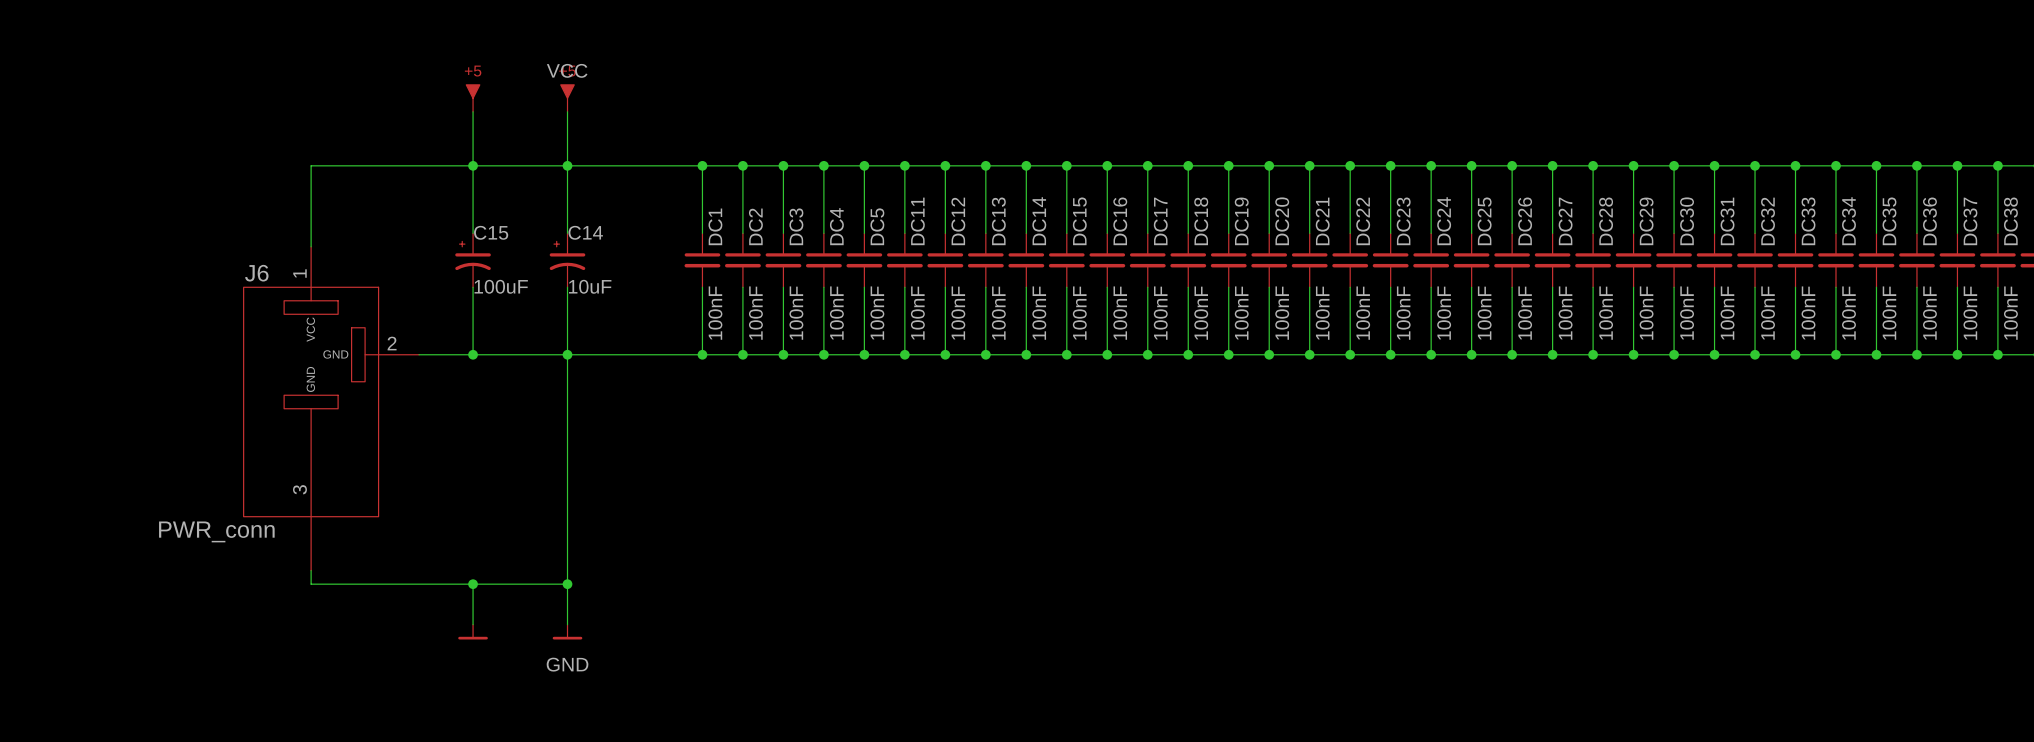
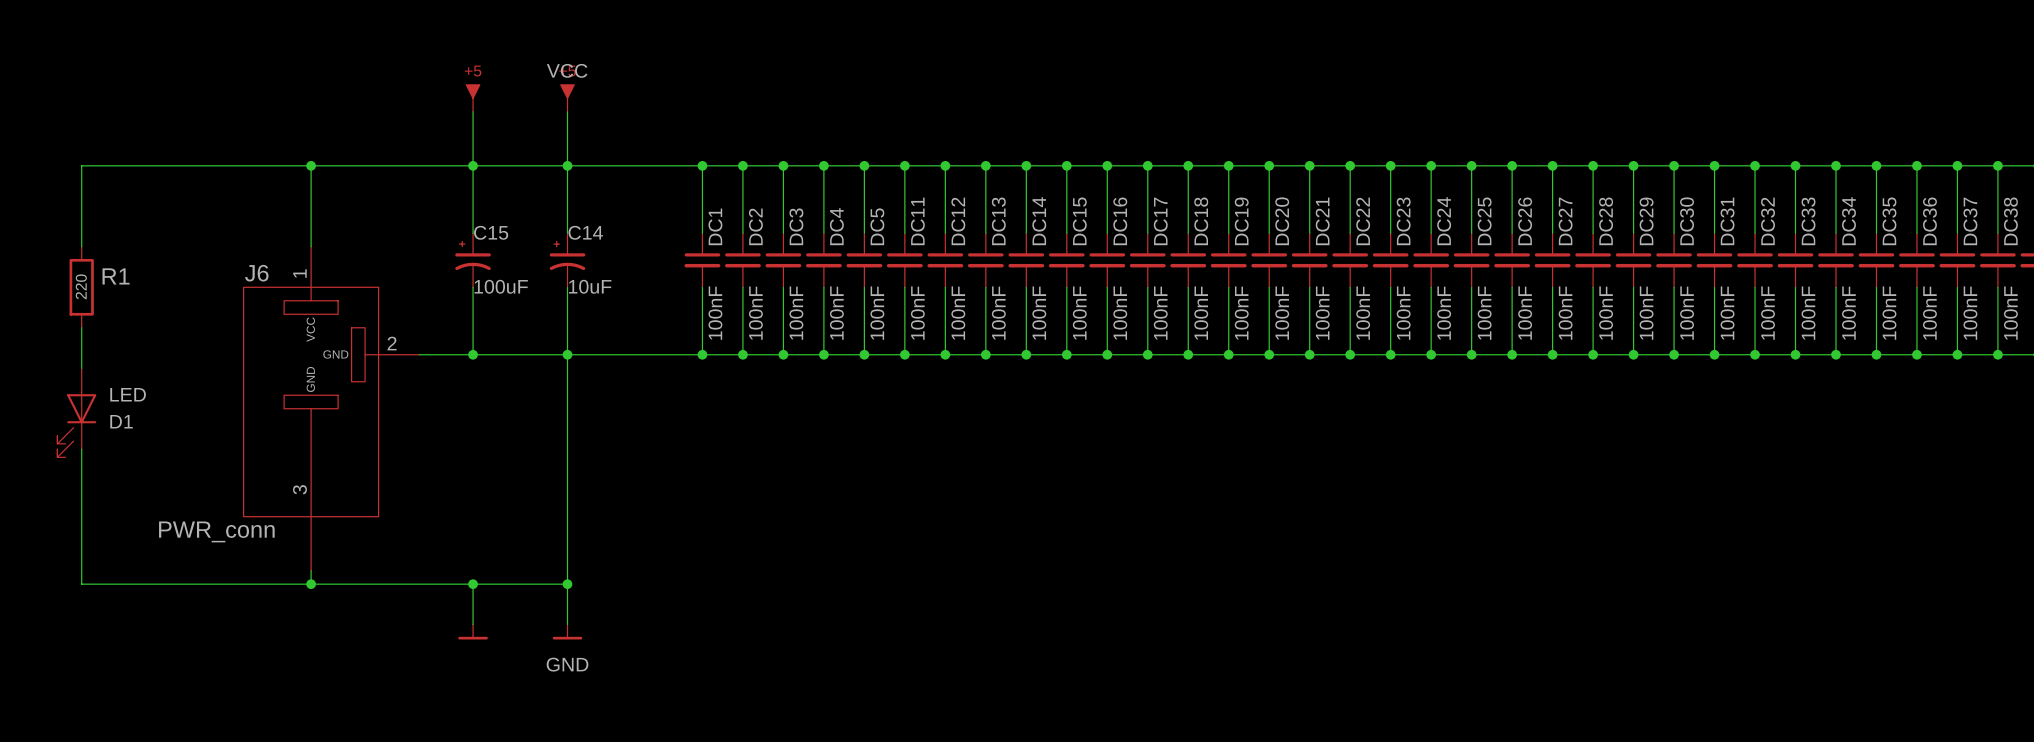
wire: none -> (311, 165) (81, 165) (81, 246)
junction: none -> (311, 165)
R1: none -> 220 (81, 287)
wire: none -> (81, 327) (81, 368)
D1: none -> LED (76, 412)
wire: none -> (81, 449) (81, 584) (311, 584)
junction: none -> (311, 584)

